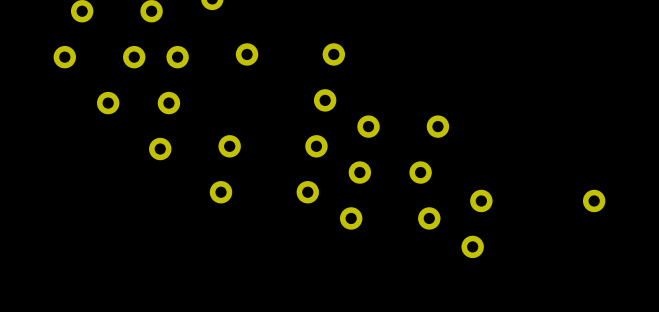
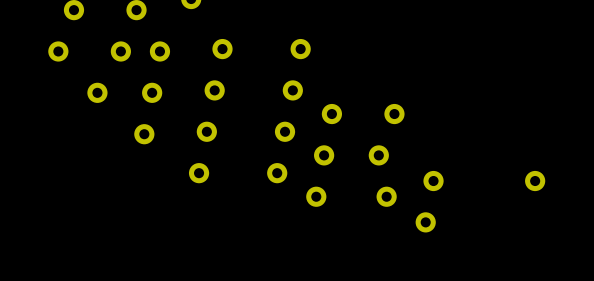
part: none -> (214, 90)

